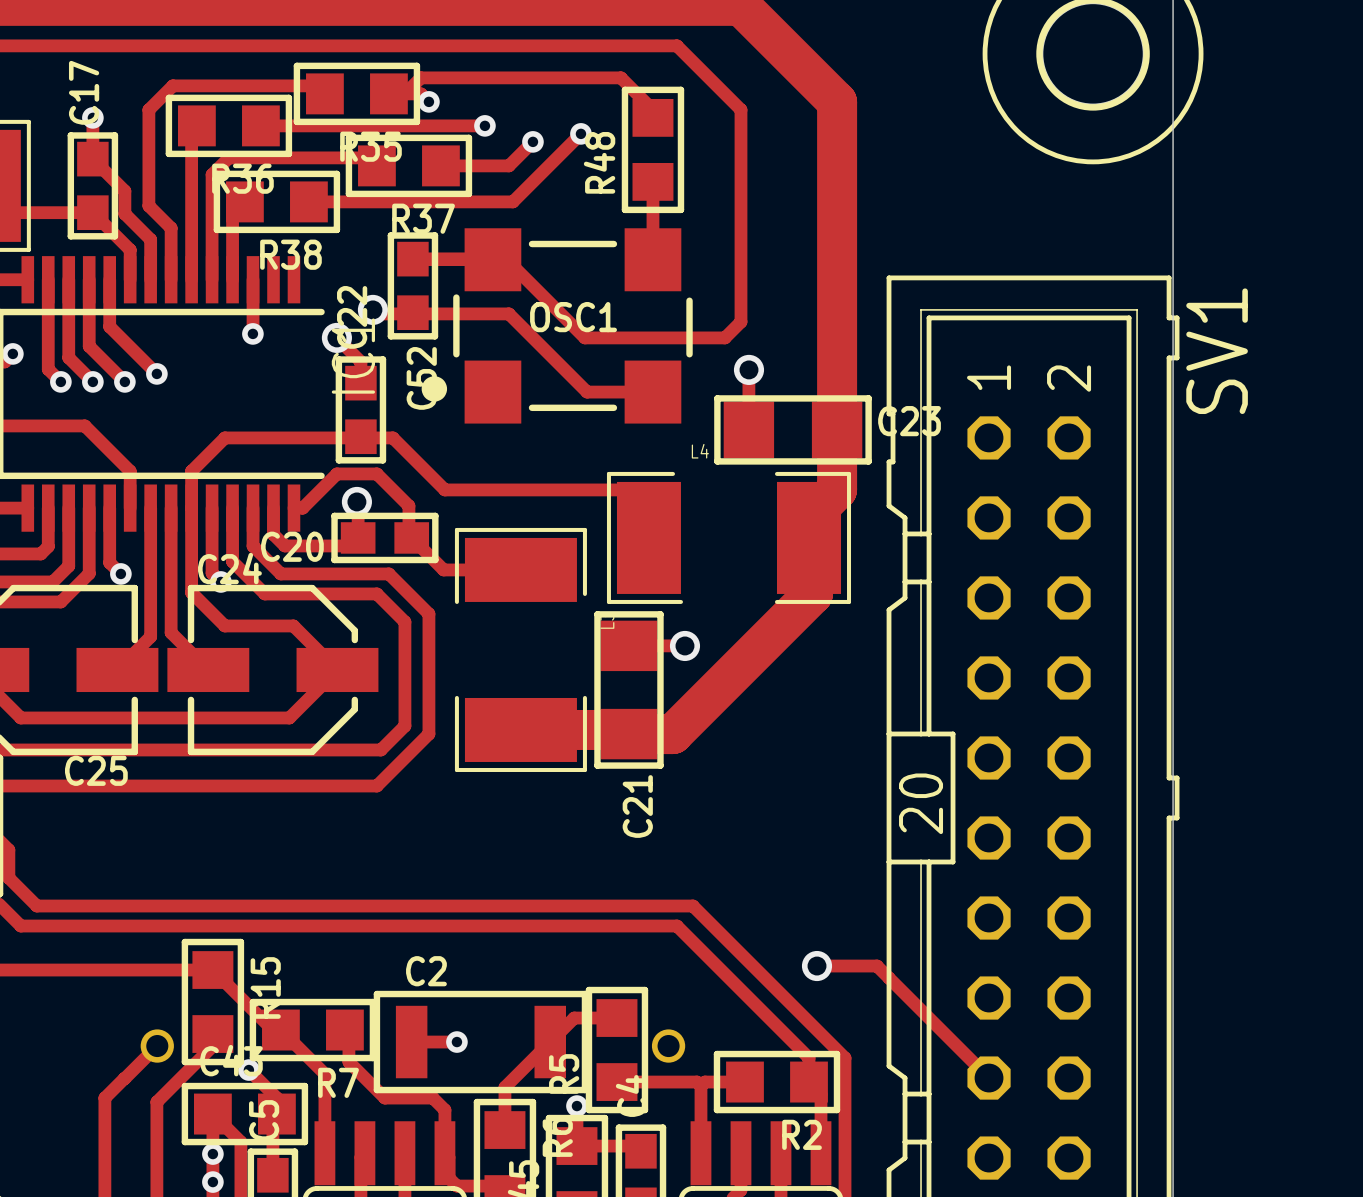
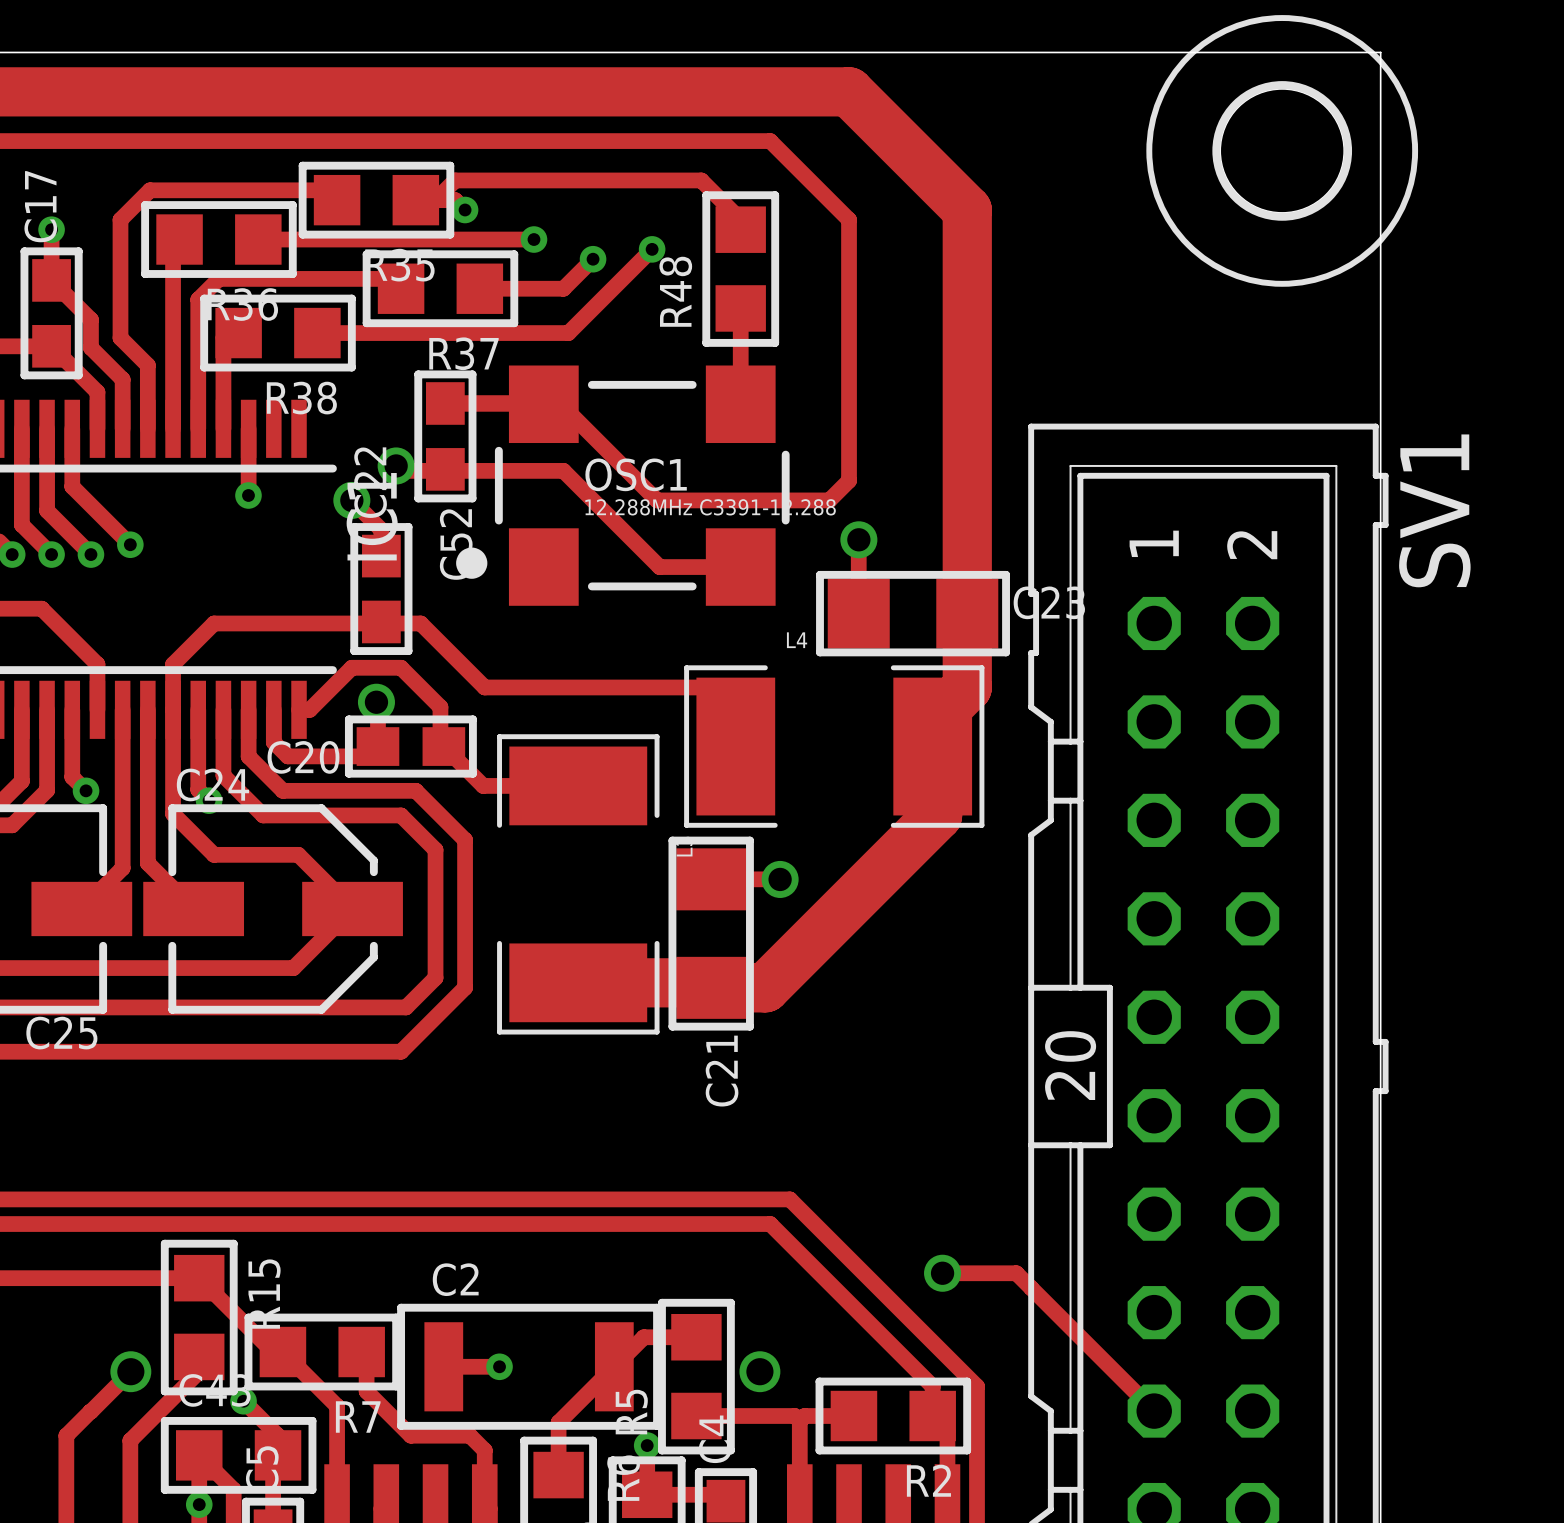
OSC1 value: none -> 12.288MHz C3391-12.288 (710, 507)

